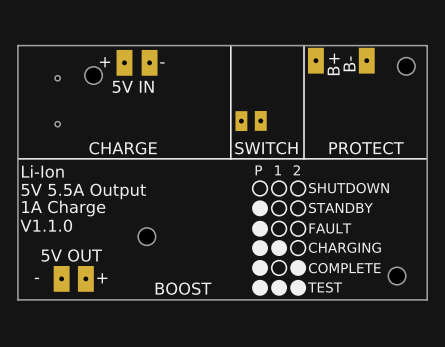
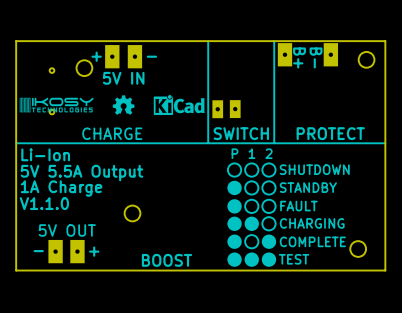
text rotation: 0° (349, 63) -> 180° (316, 57)
text rotation: 0° (333, 64) -> 180° (299, 57)
drawing: none -> [112, 95, 135, 115]
drawing: none -> [153, 95, 205, 116]
drawing: none -> [19, 97, 94, 113]

